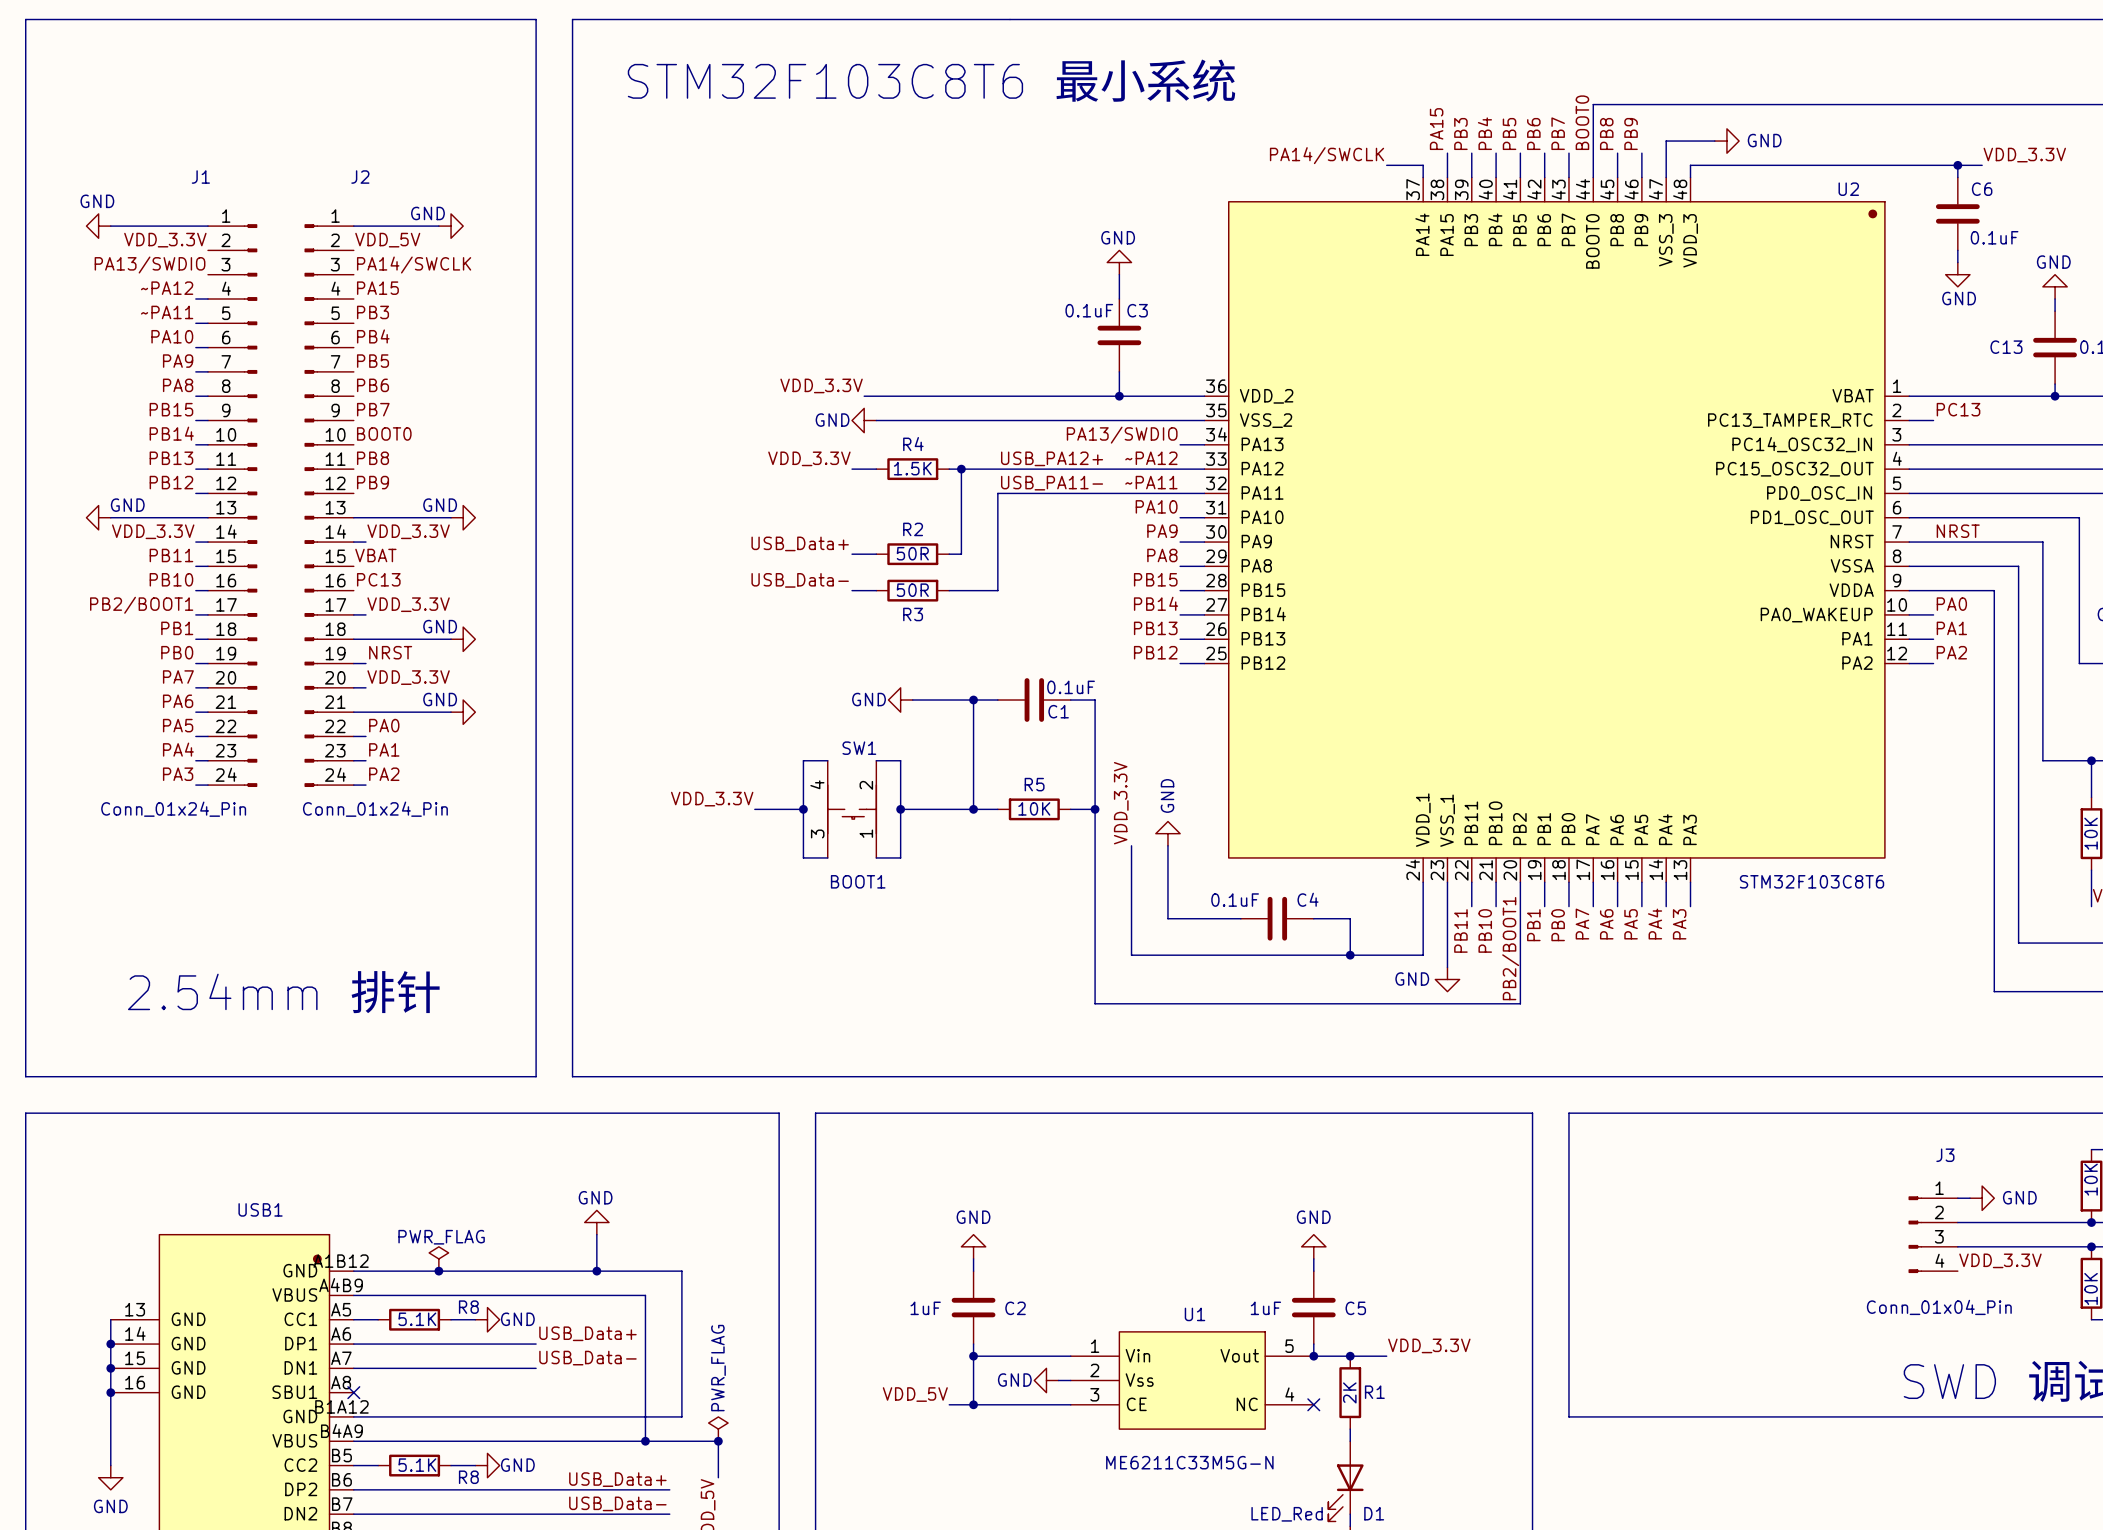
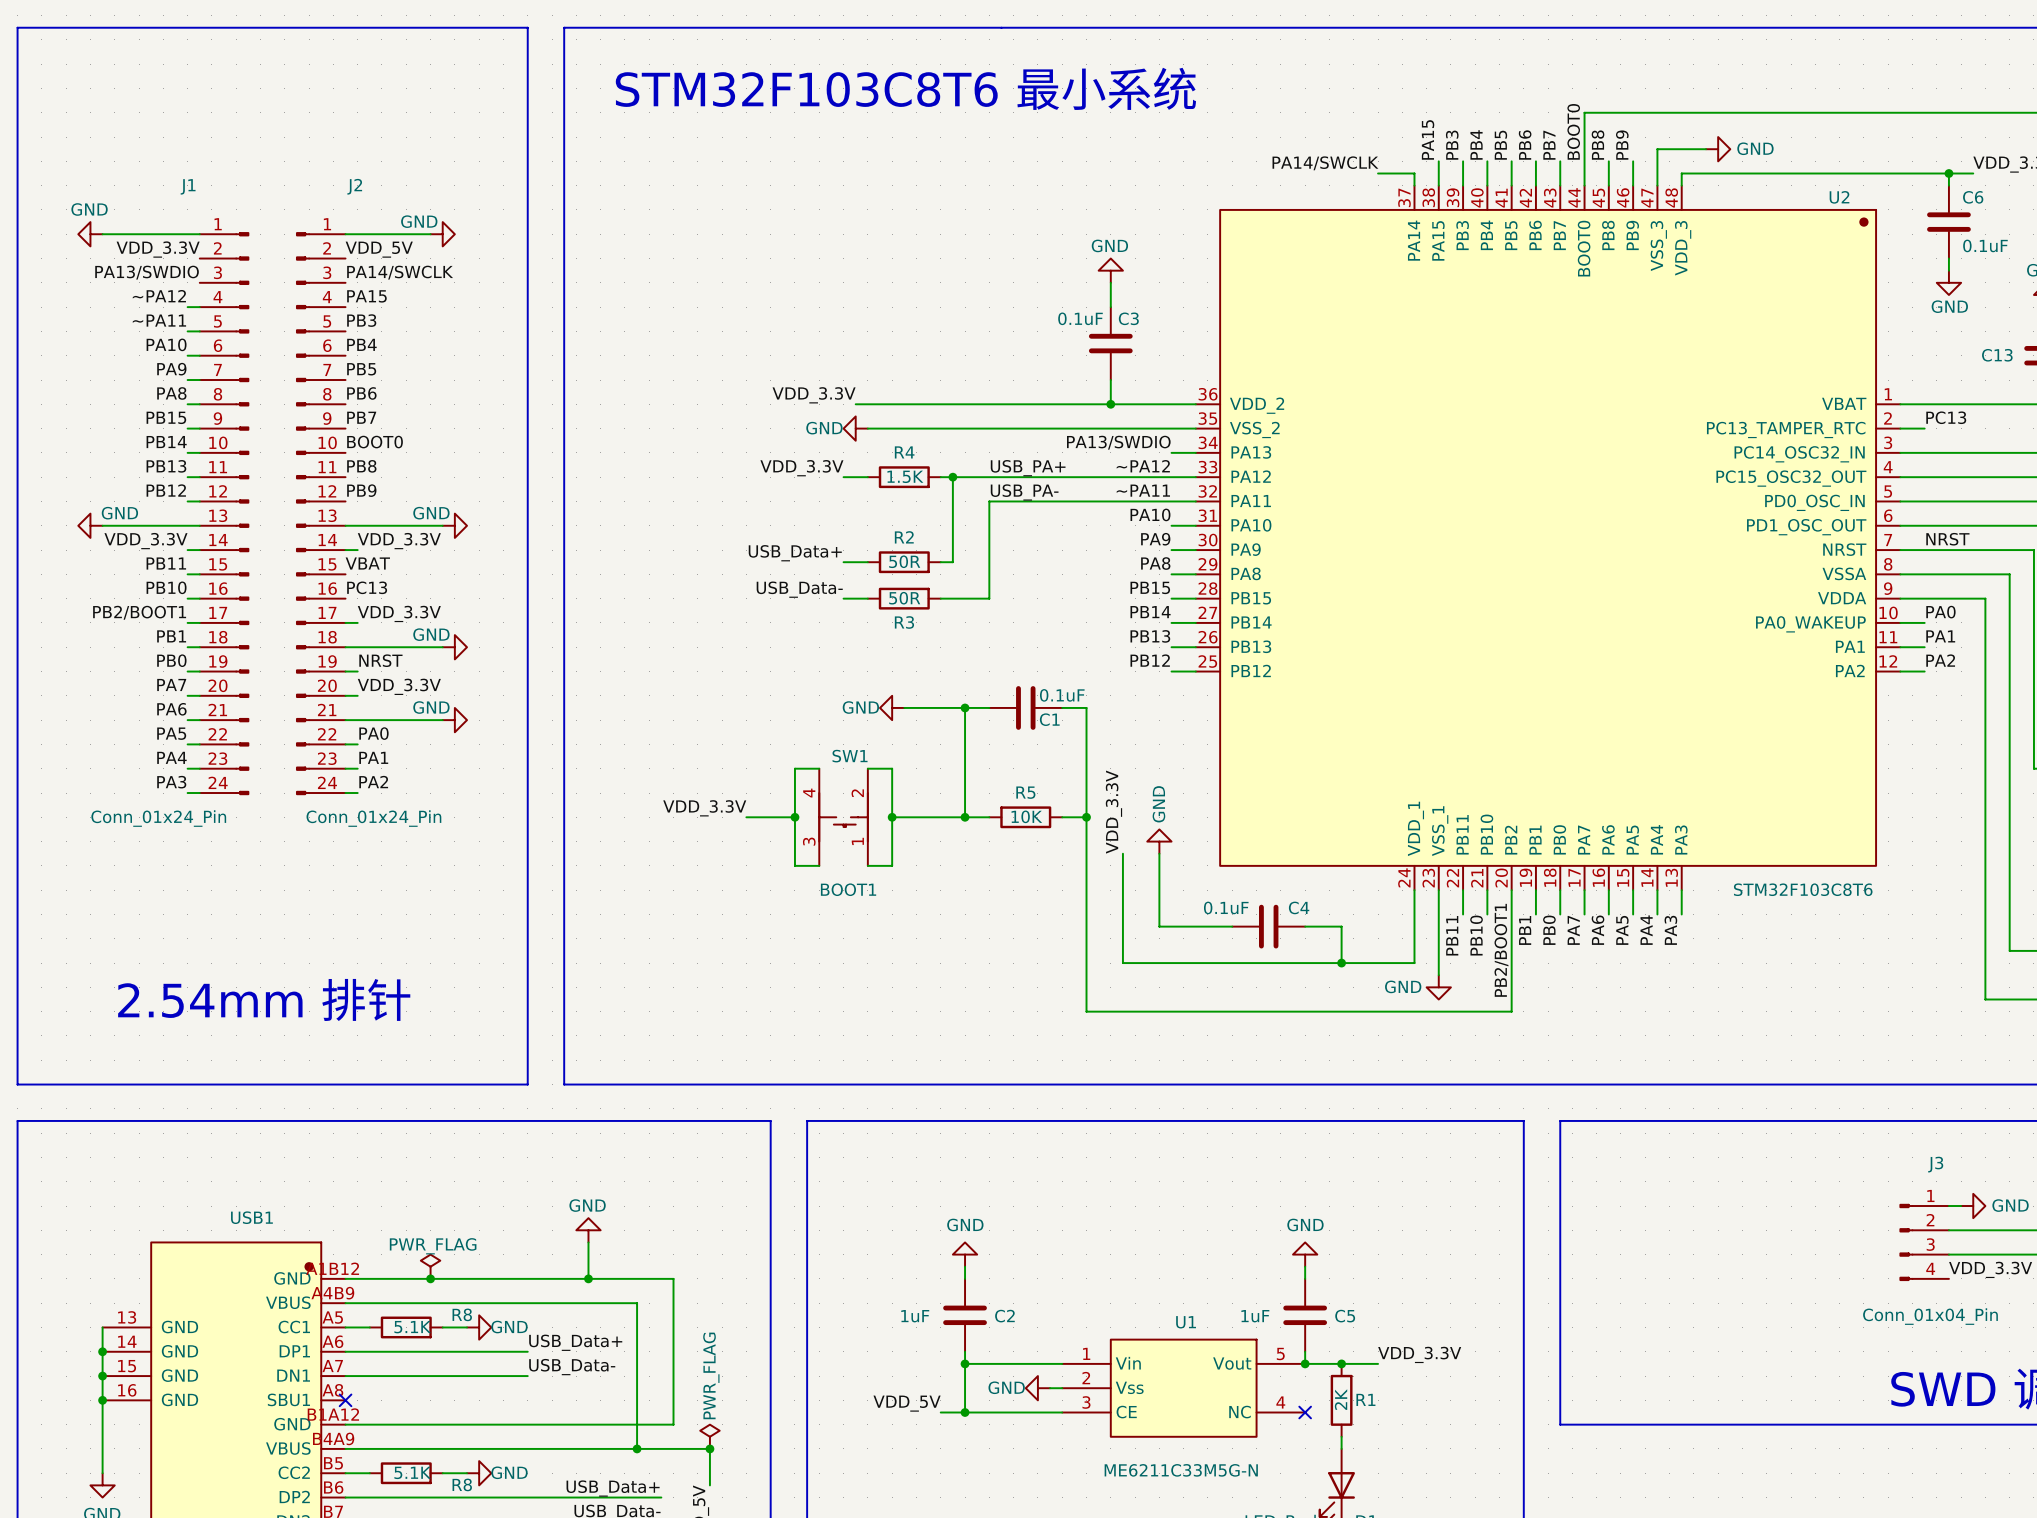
label: USB_PA12+ (1052, 458) -> USB_PA+ (1028, 468)
label: USB_PA11- (1052, 483) -> USB_PA- (1024, 492)

